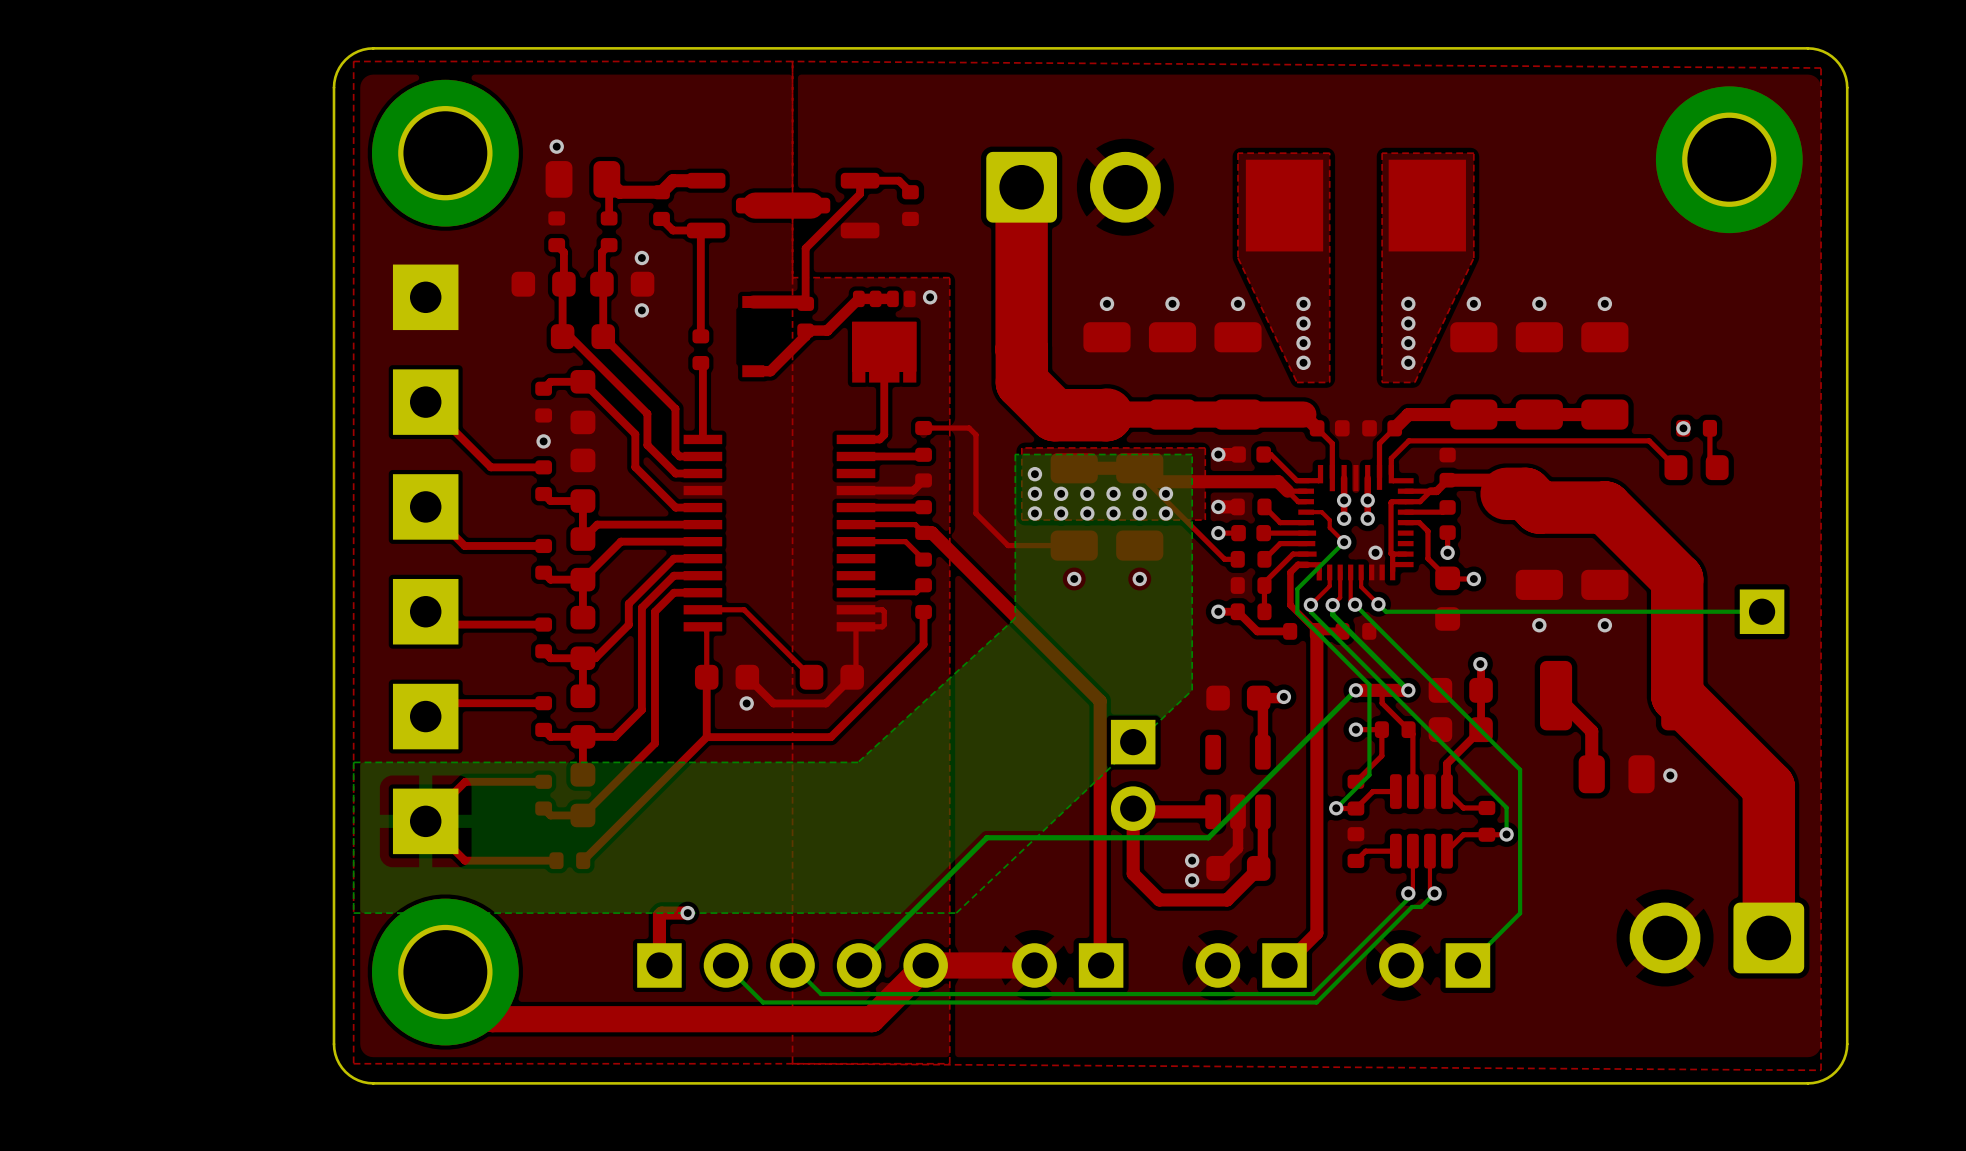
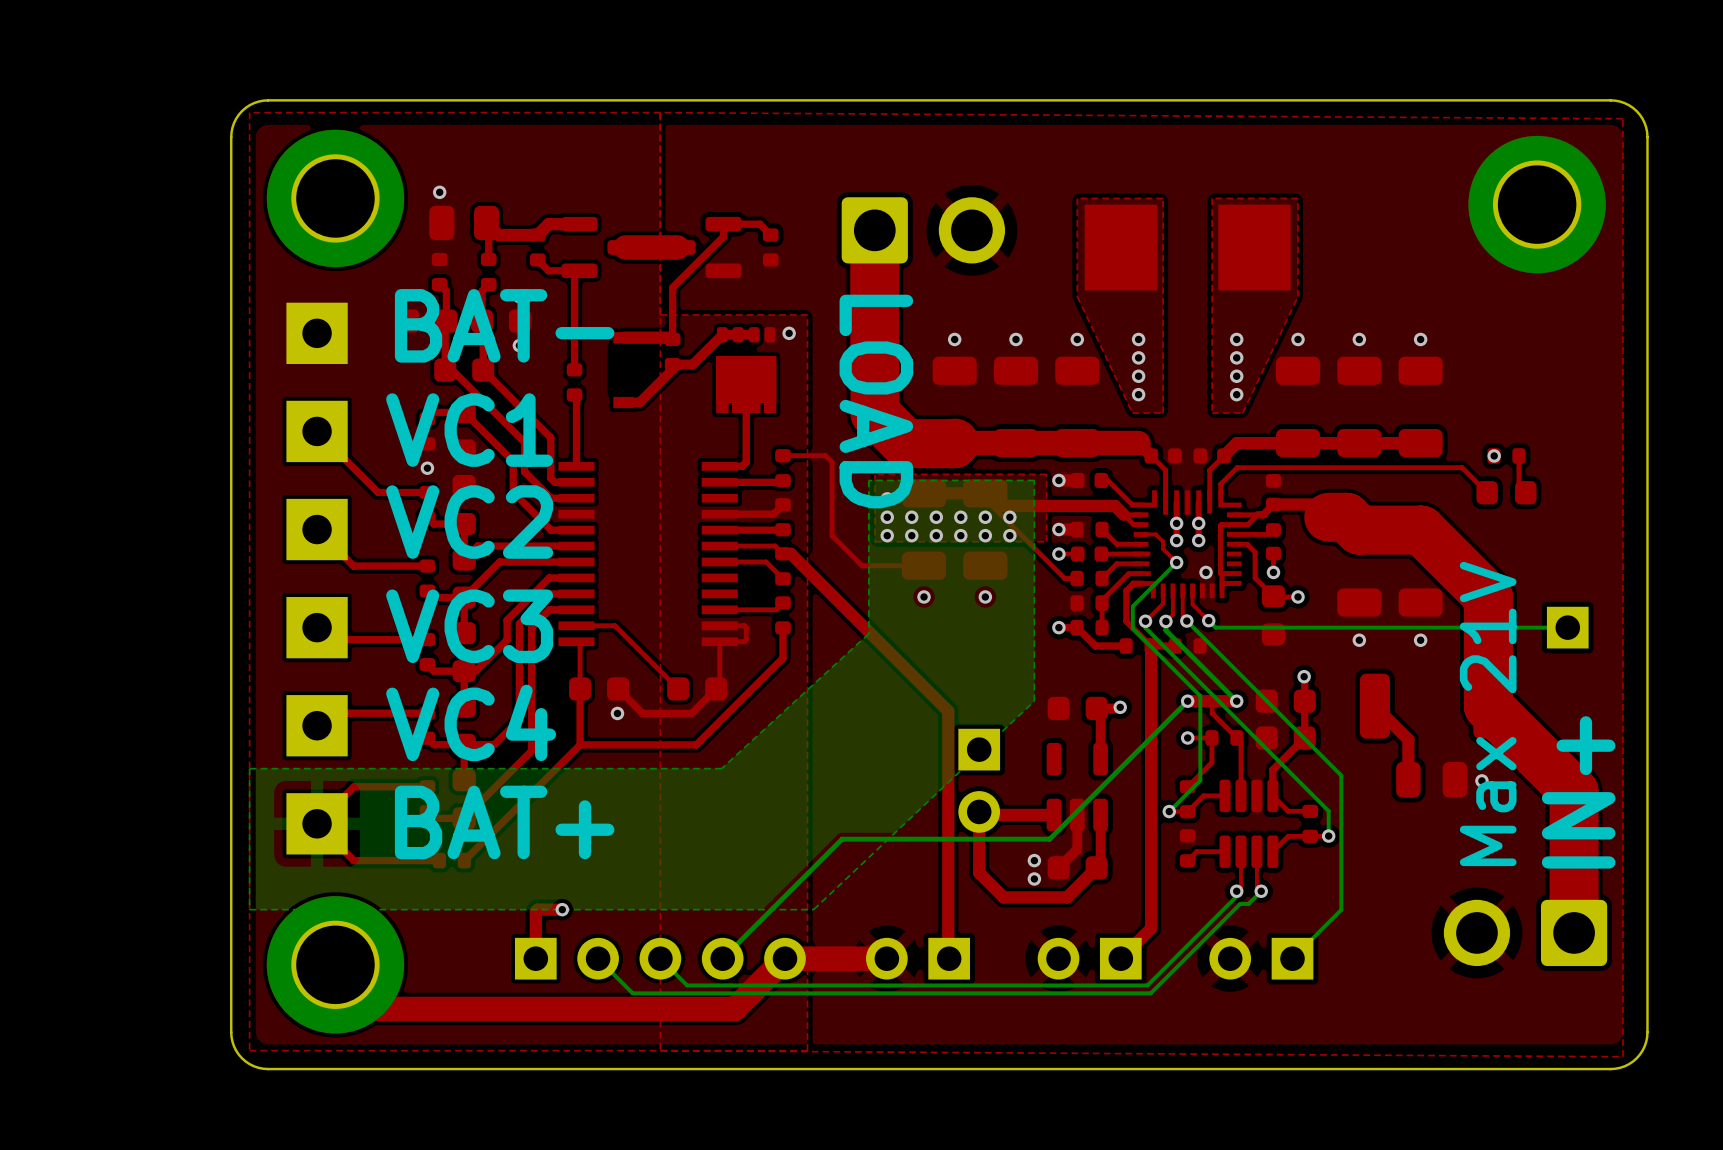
text: none -> BAT- (504, 325)
text: none -> LOAD (876, 401)
text: none -> VC1 (469, 430)
text: none -> VC2 (469, 522)
text: none -> VC3 (469, 626)
text: none -> Max 21V (1488, 713)
text: none -> VC4 (471, 722)
text: none -> IN+ (1578, 792)
text: none -> BAT+ (504, 822)

